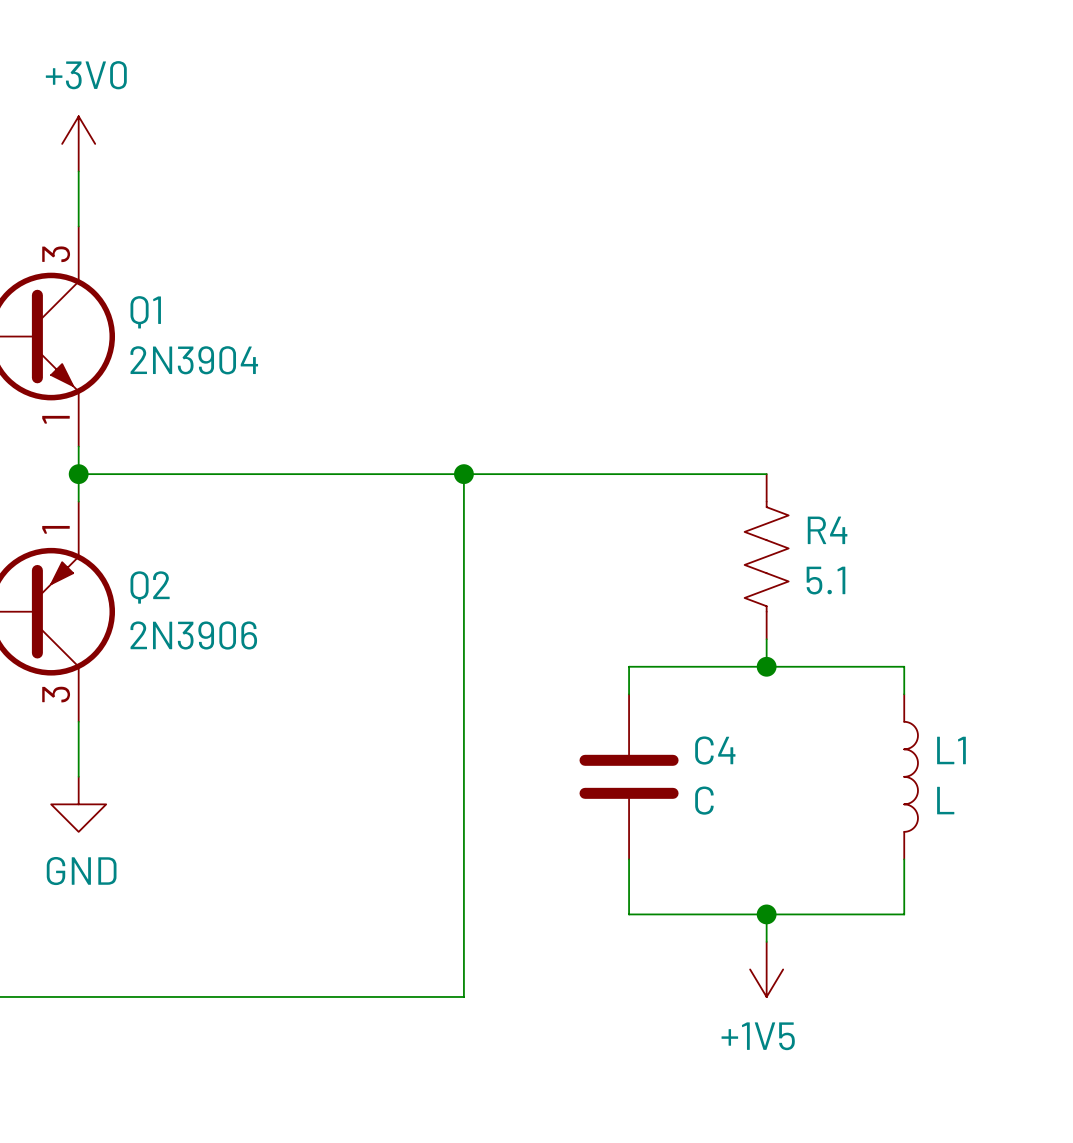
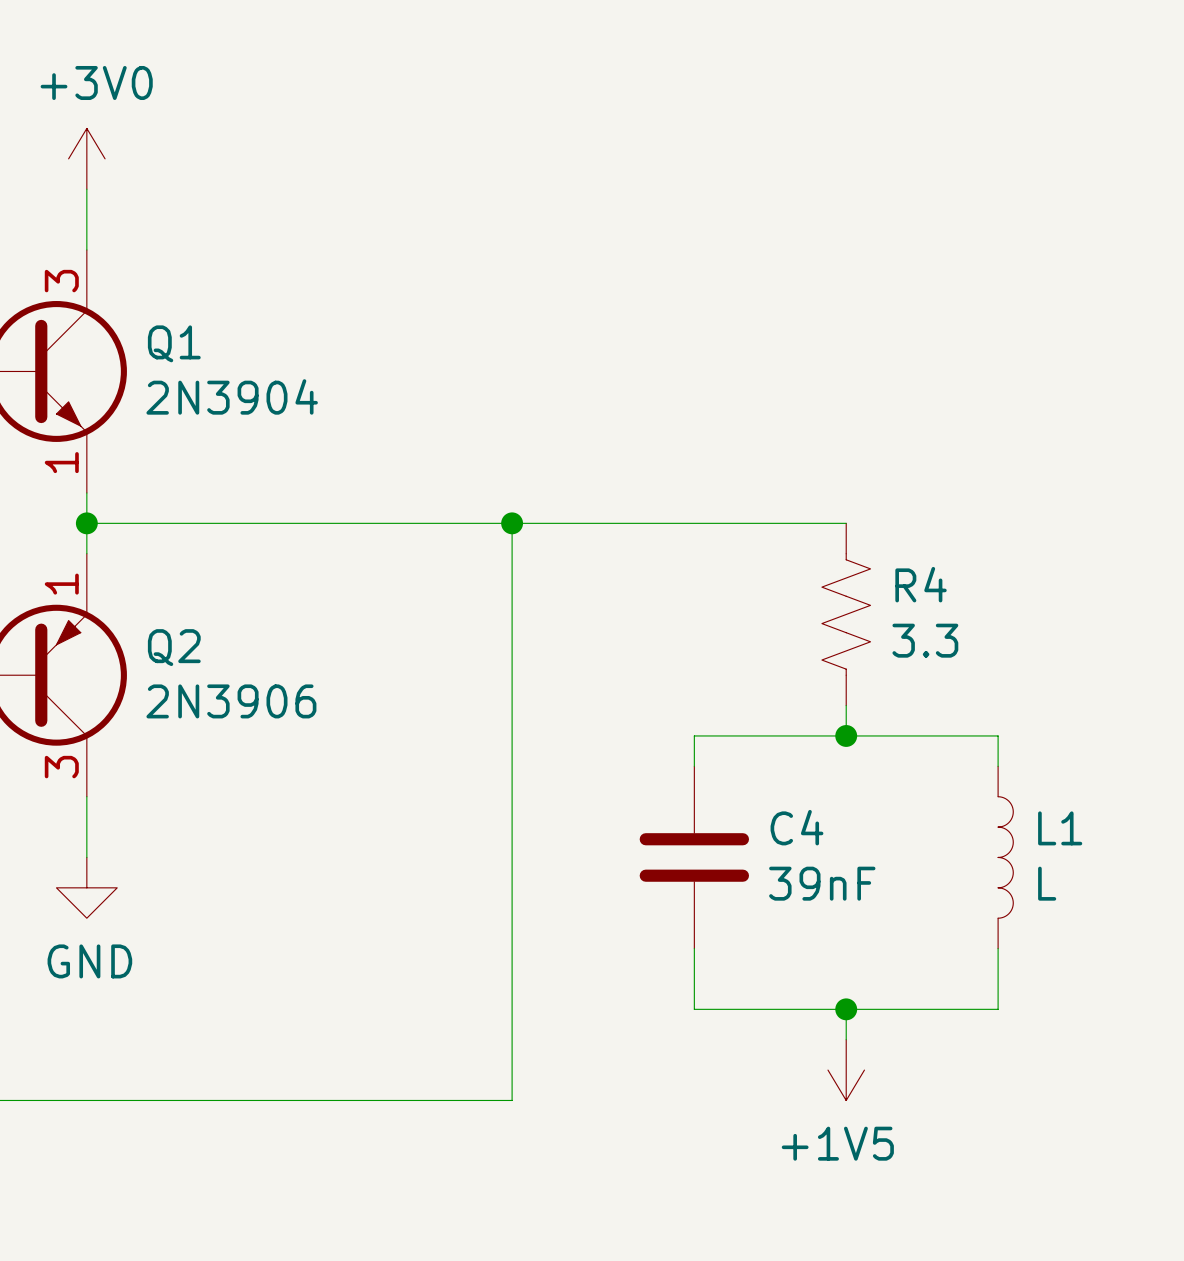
R4 value: 5.1 (825, 580) -> 3.3 (925, 640)
C4 value: C (704, 800) -> 39nF (822, 883)

